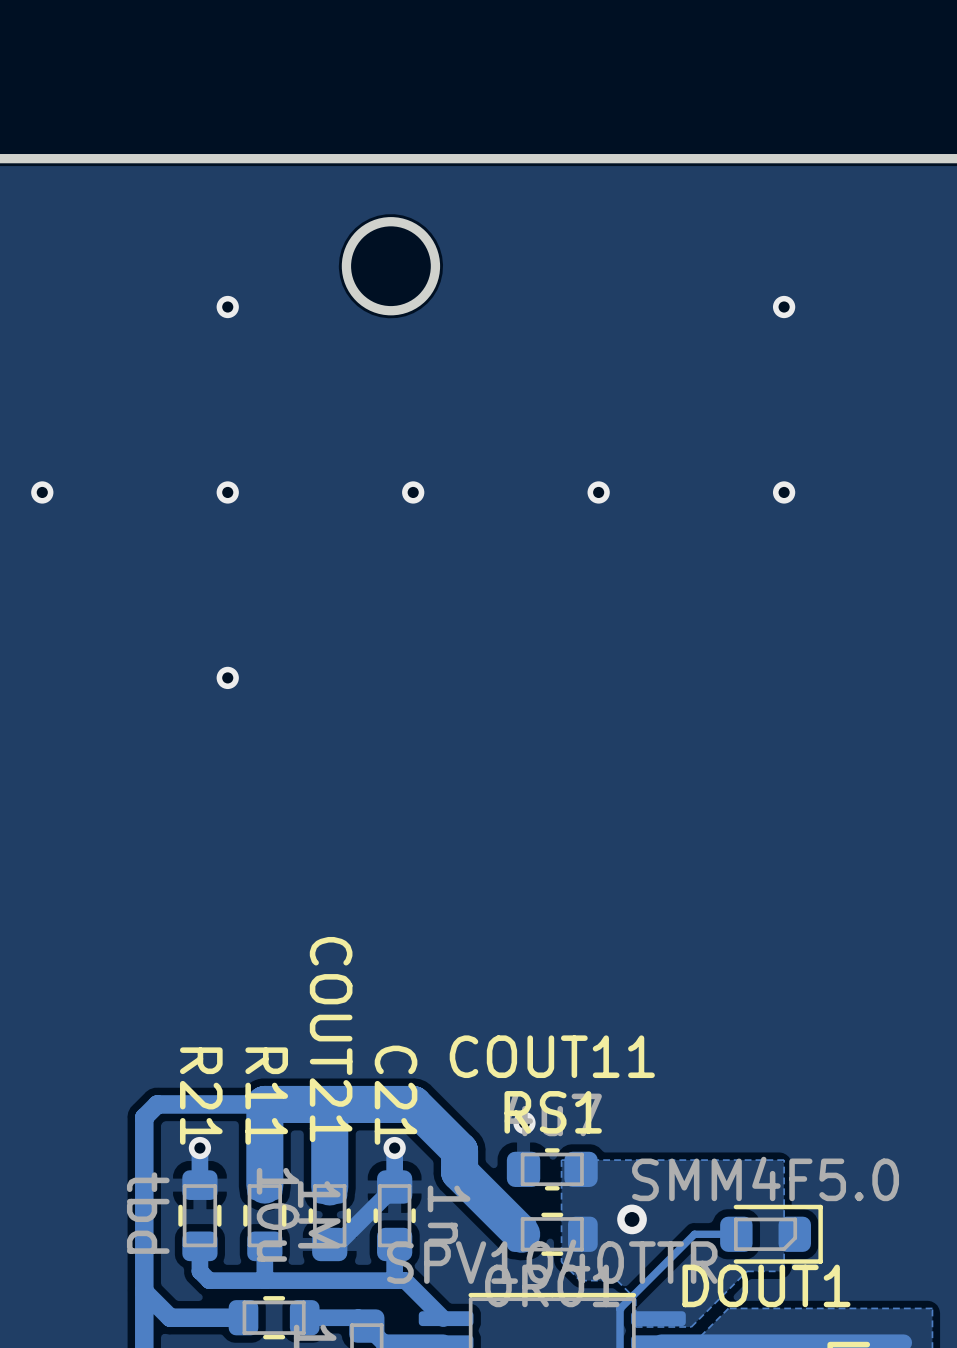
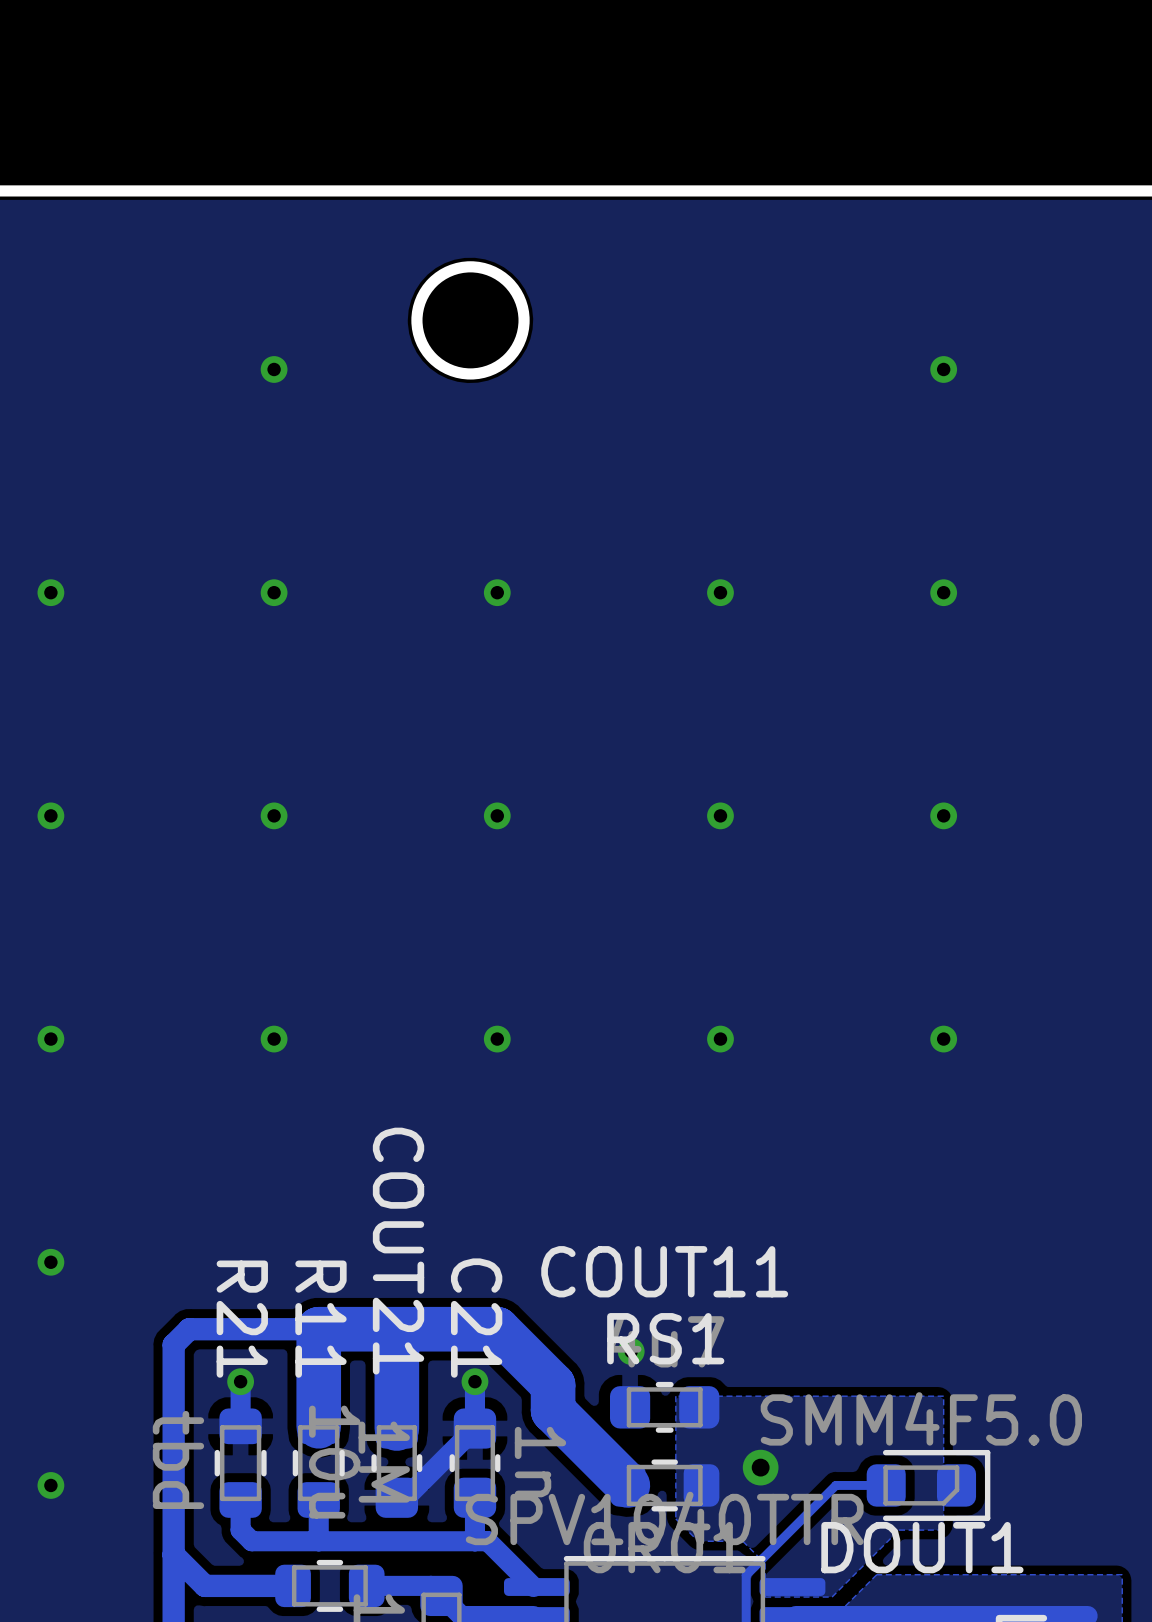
via: none -> (50, 815)
via: none -> (497, 815)
via: none -> (720, 815)
via: none -> (943, 815)
via: none -> (50, 1039)
via: none -> (274, 1039)
via: none -> (497, 1039)
via: none -> (720, 1039)
via: none -> (943, 1039)
via: none -> (50, 1262)
via: none -> (50, 1485)

